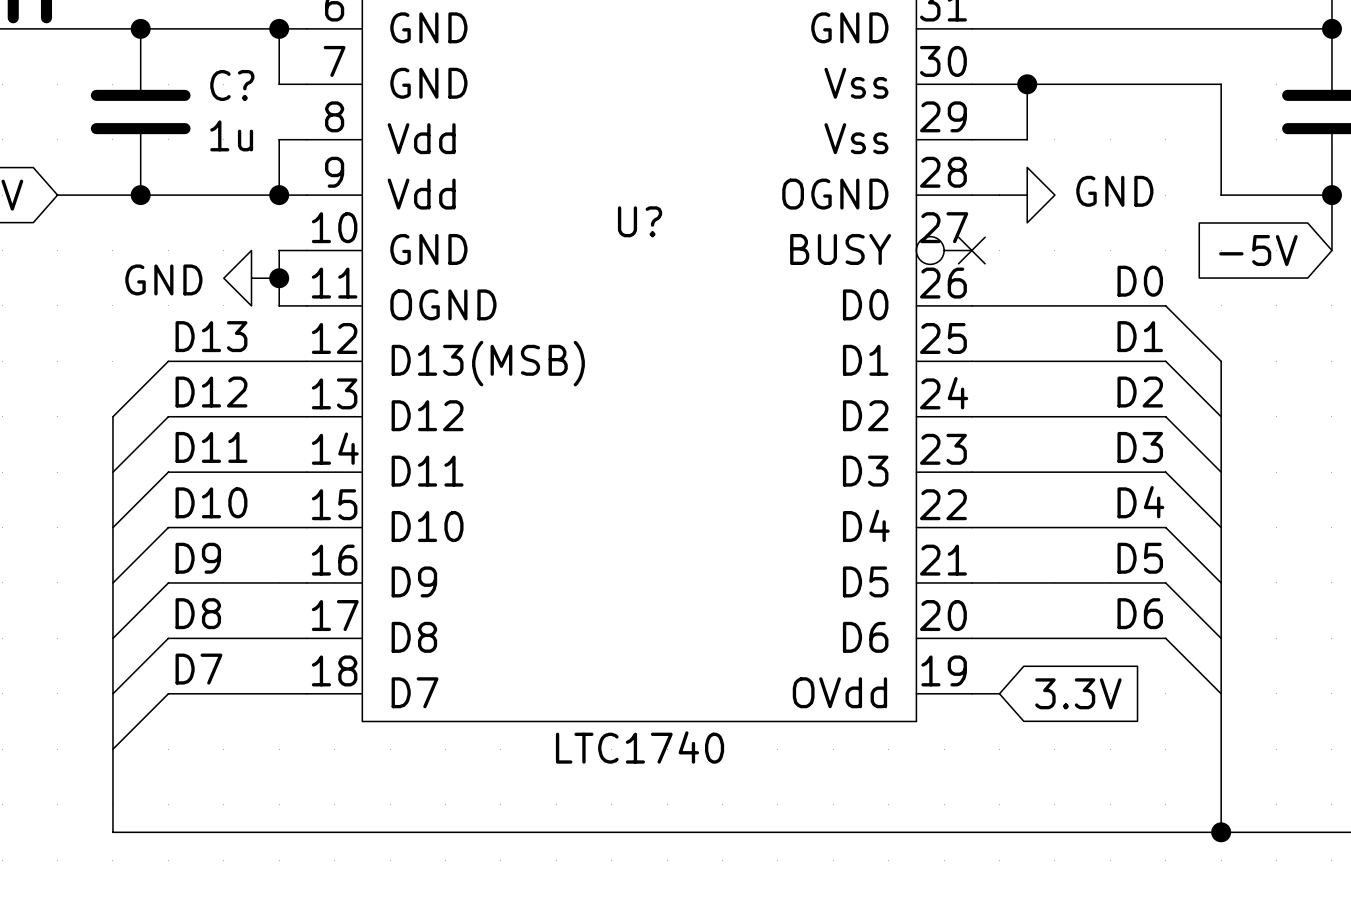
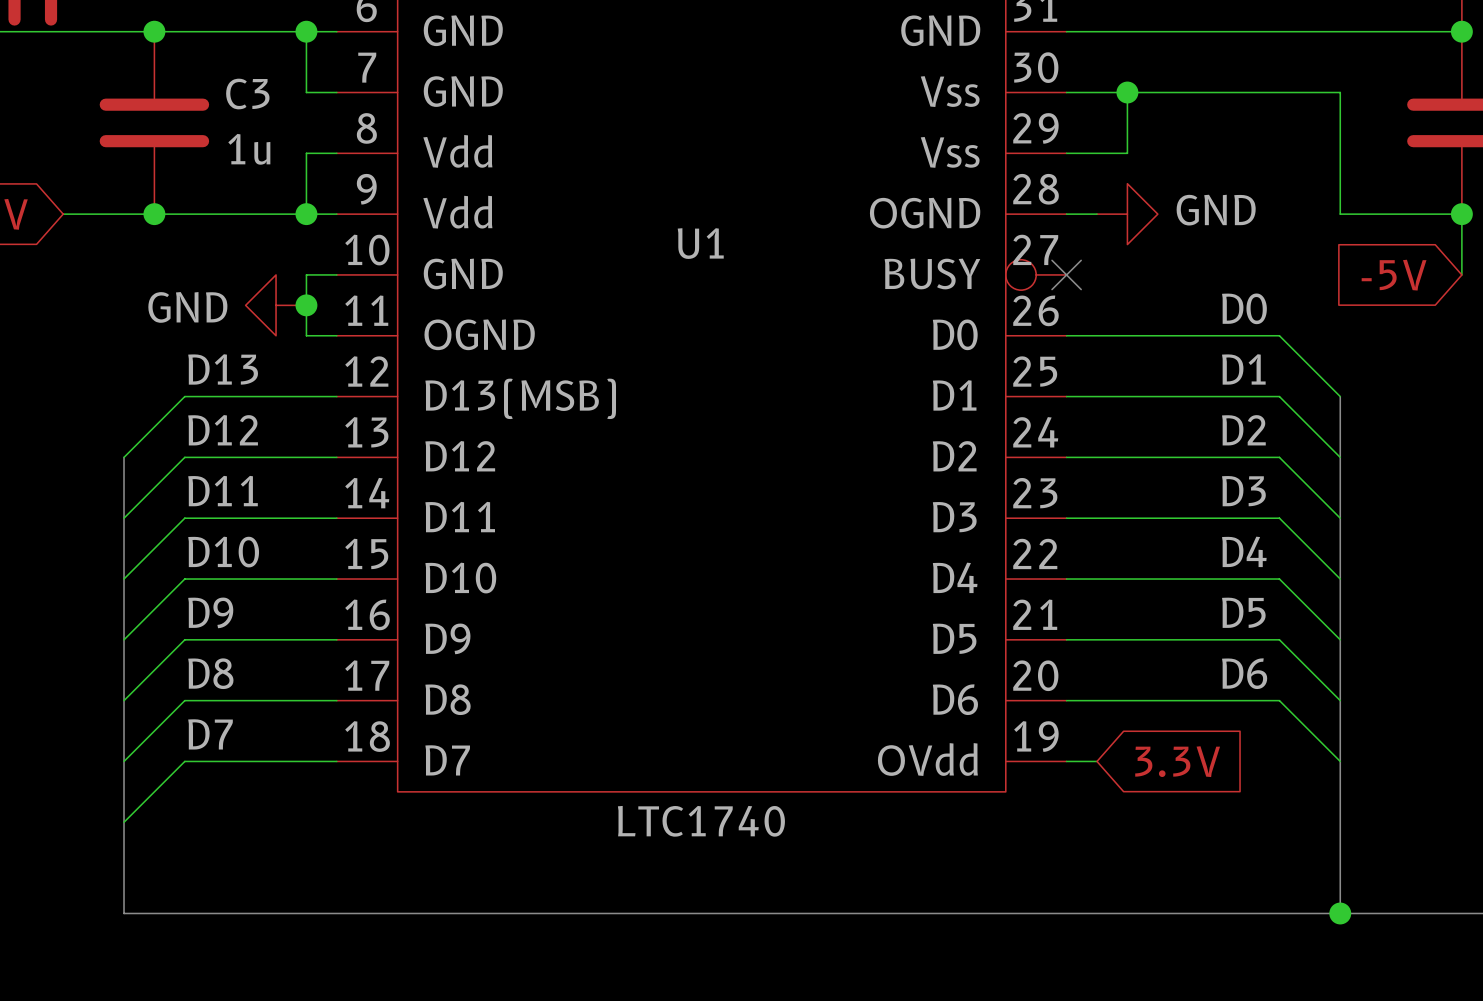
C? name: C? (232, 85) -> C3 (247, 94)
U? name: U? (640, 221) -> U1 (700, 243)

